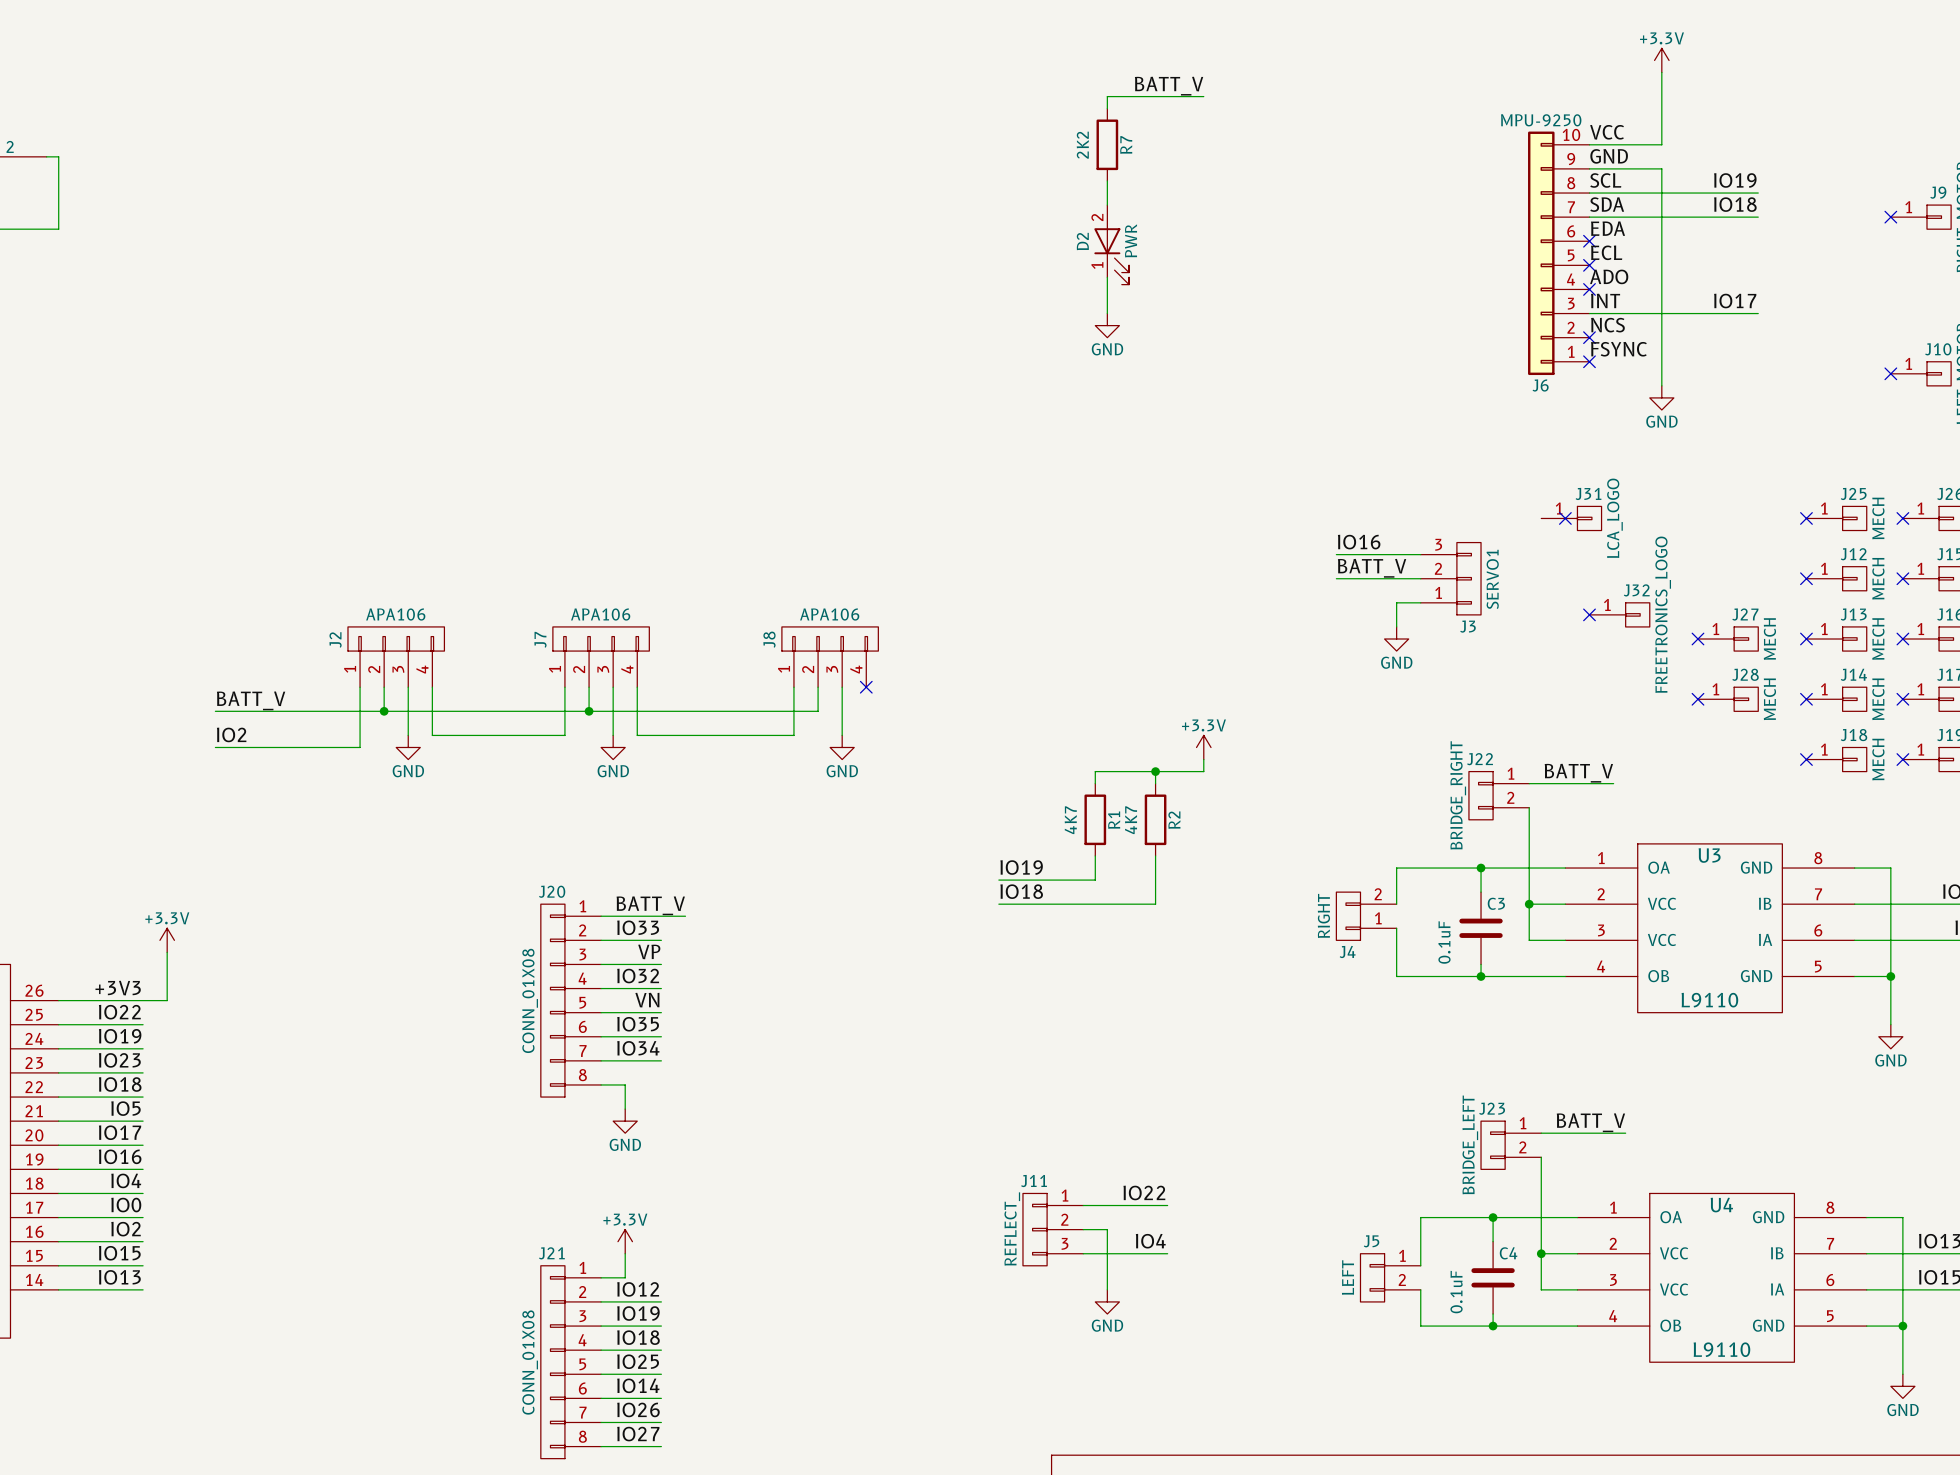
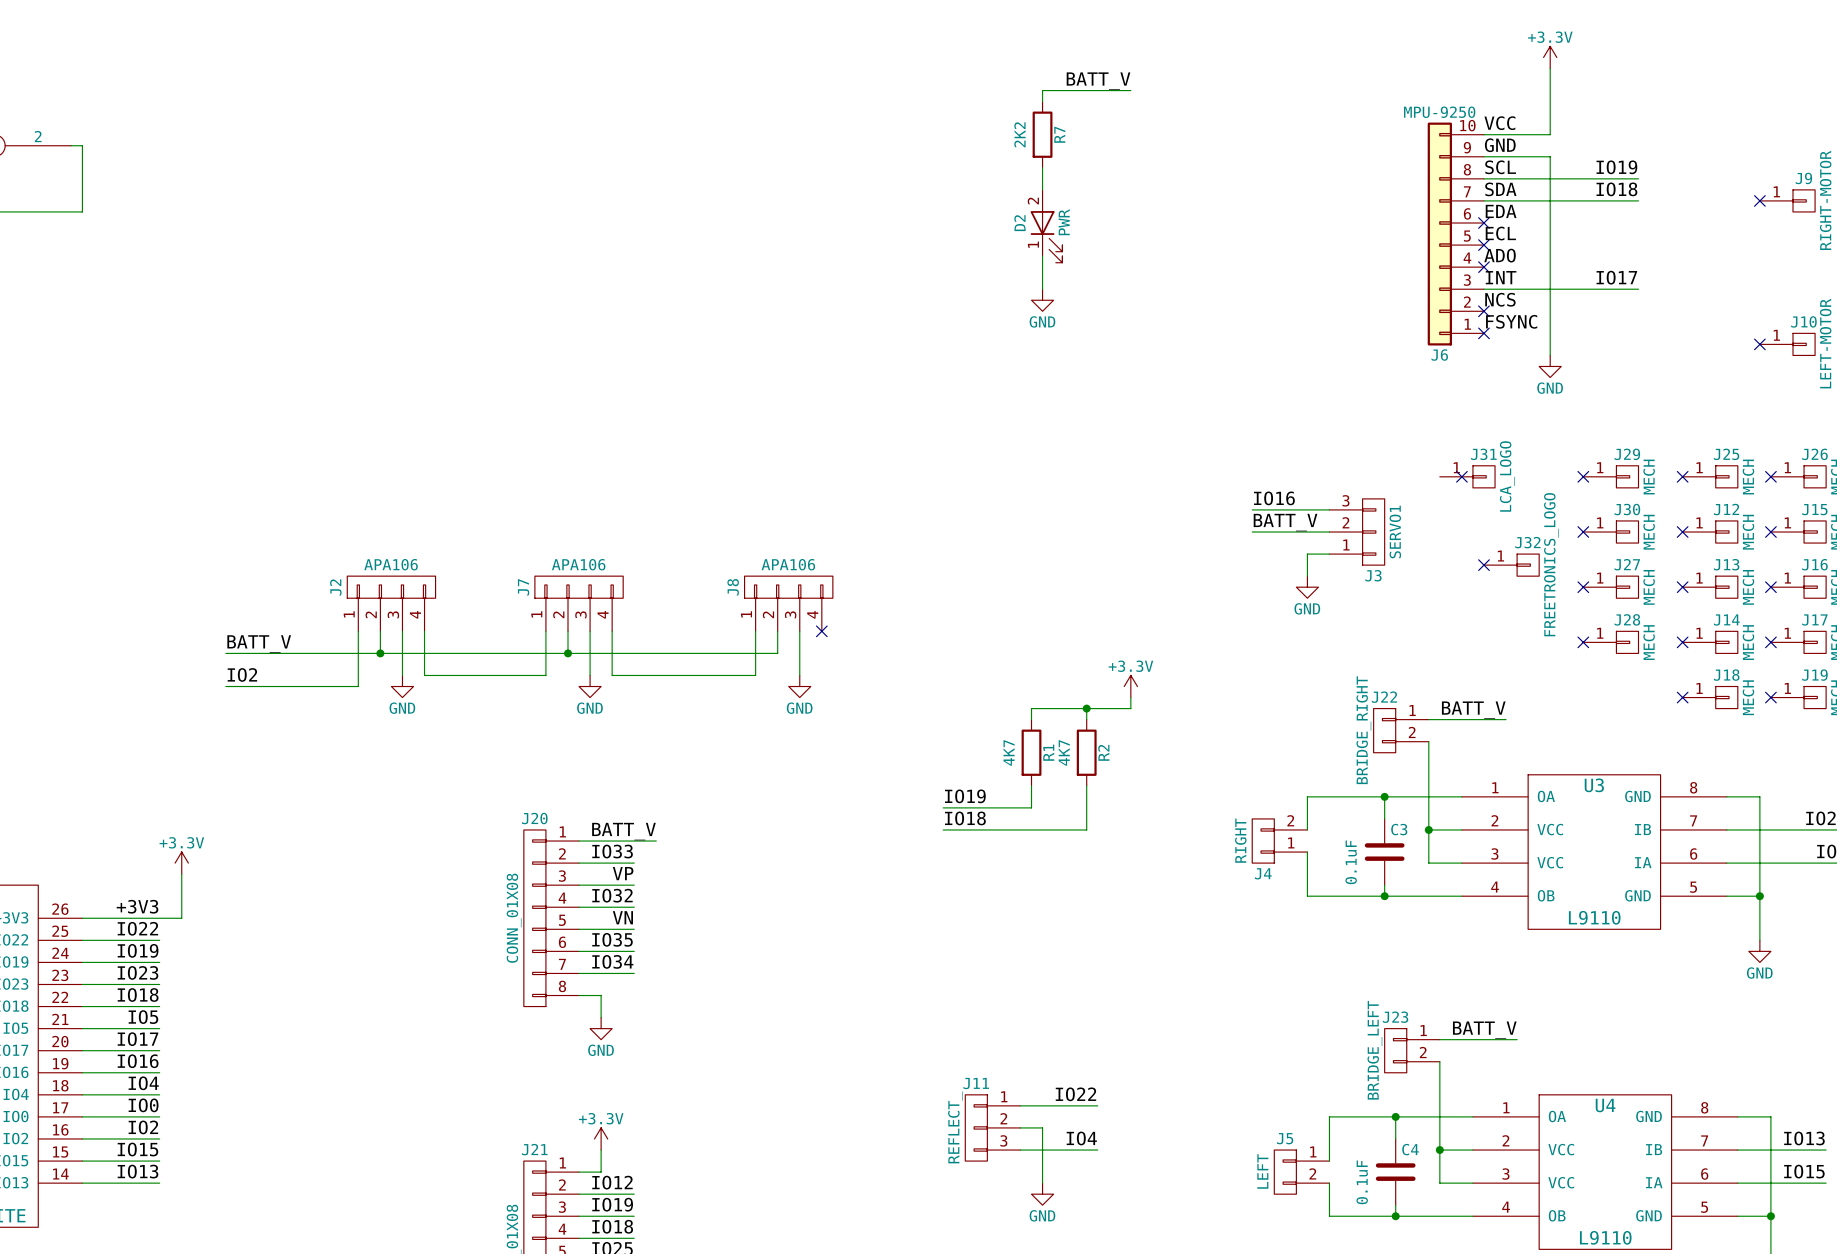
no-connect mark: none -> (1583, 476)
J29: none -> MECH (1610, 476)
no-connect mark: none -> (1583, 532)
J30: none -> MECH (1610, 532)

